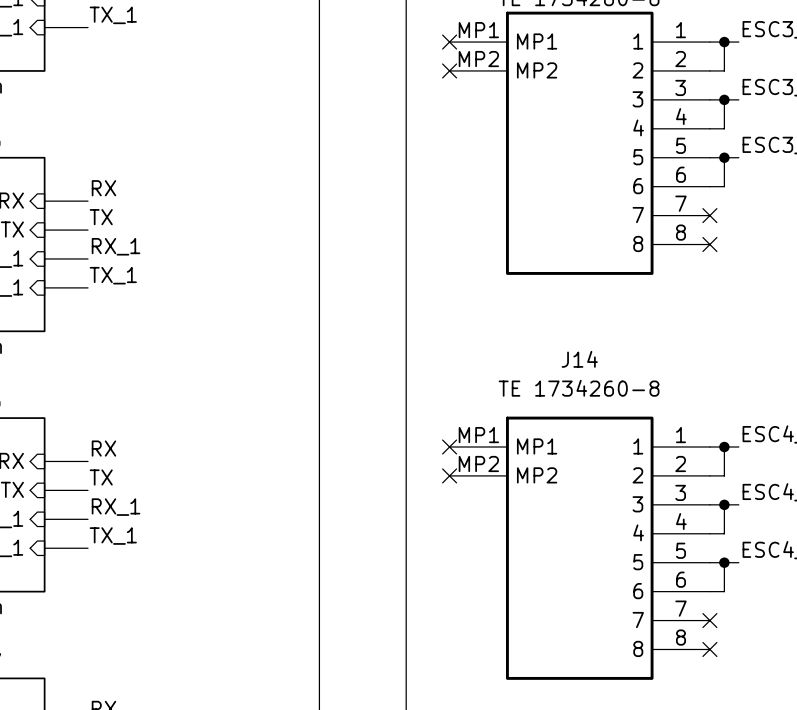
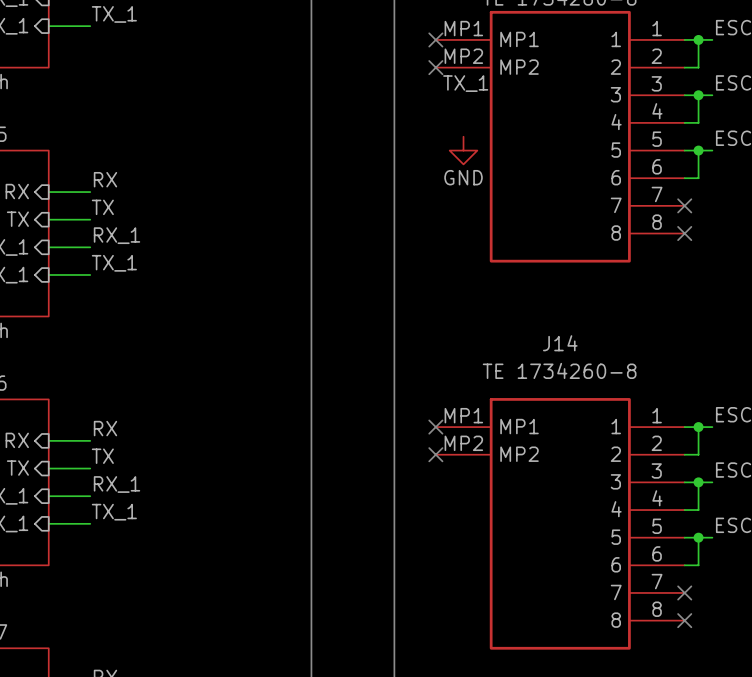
label: none -> TX_1 (465, 83)
power symbol: none -> GND (463, 150)

